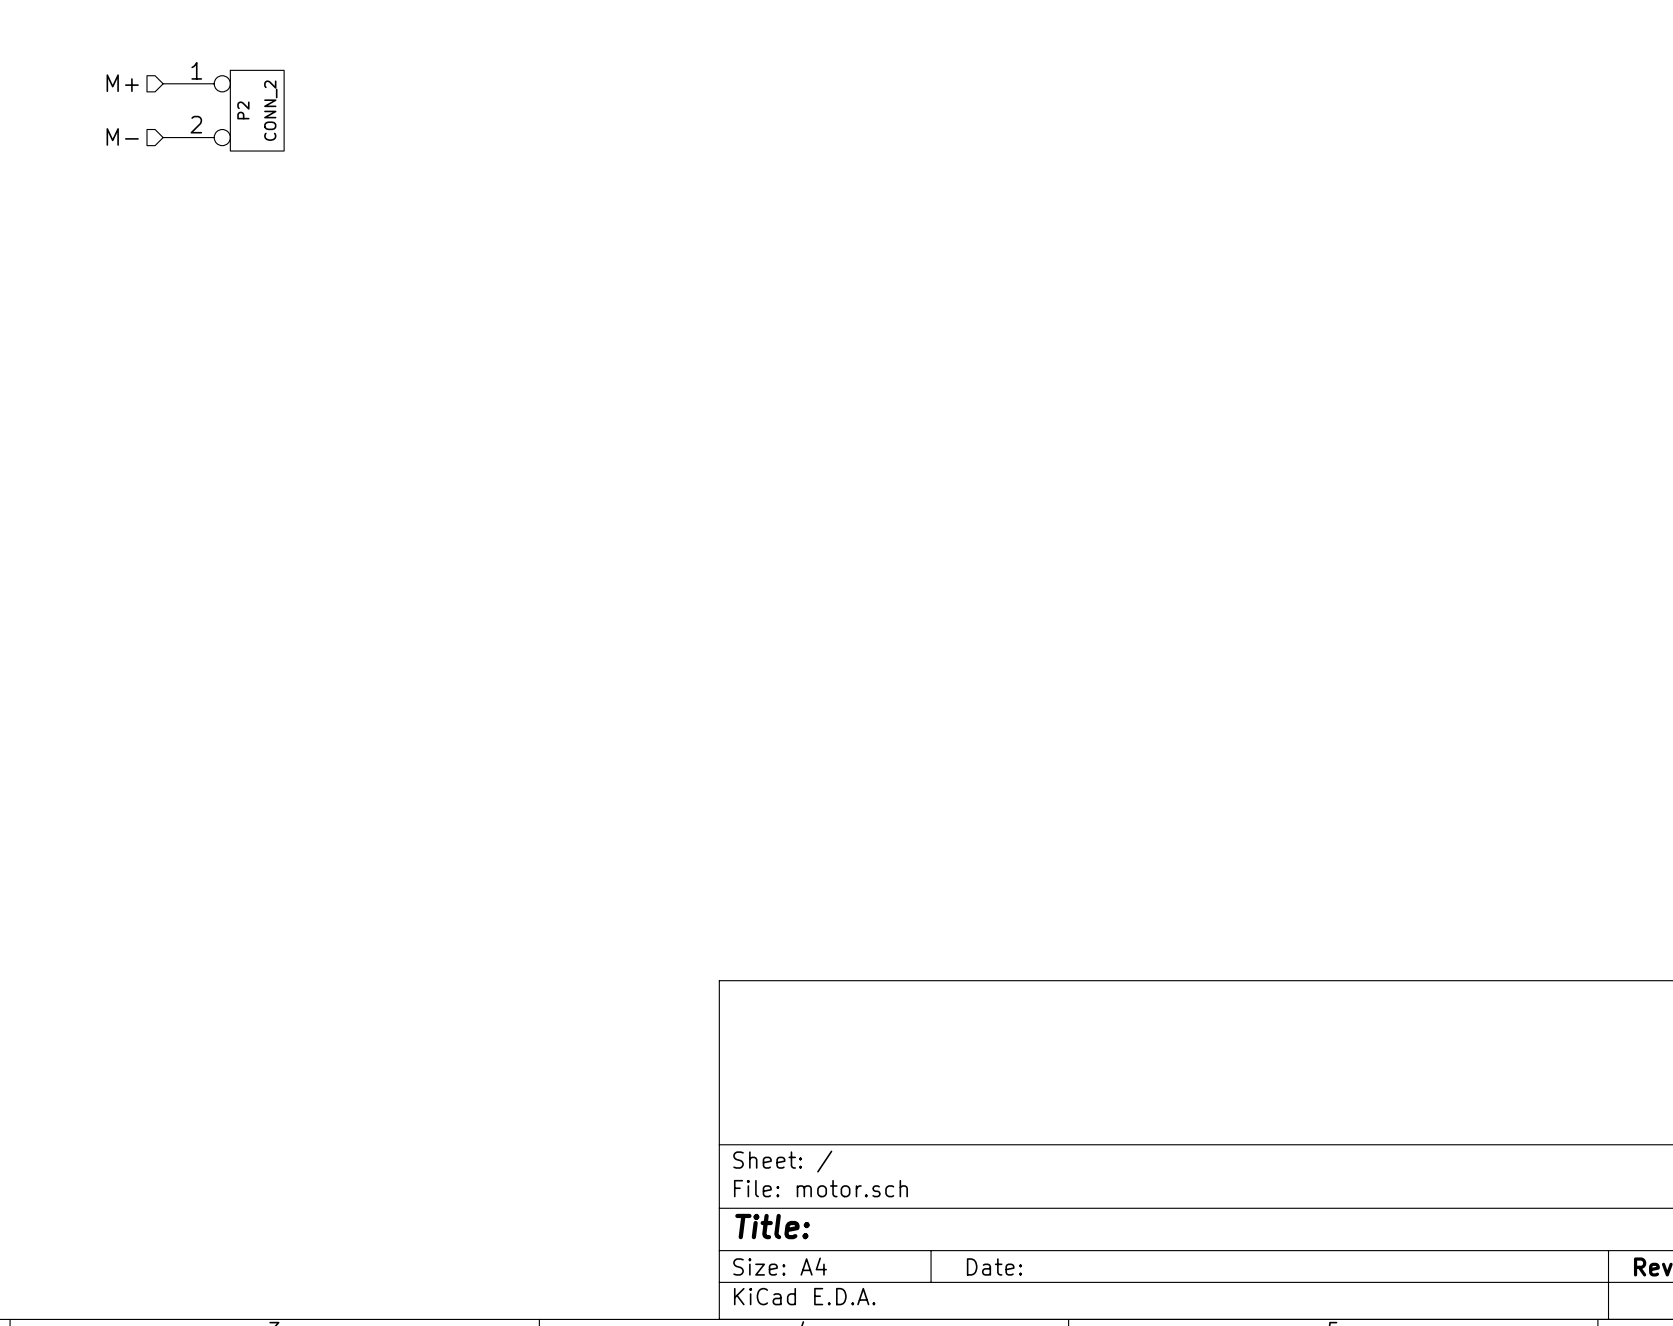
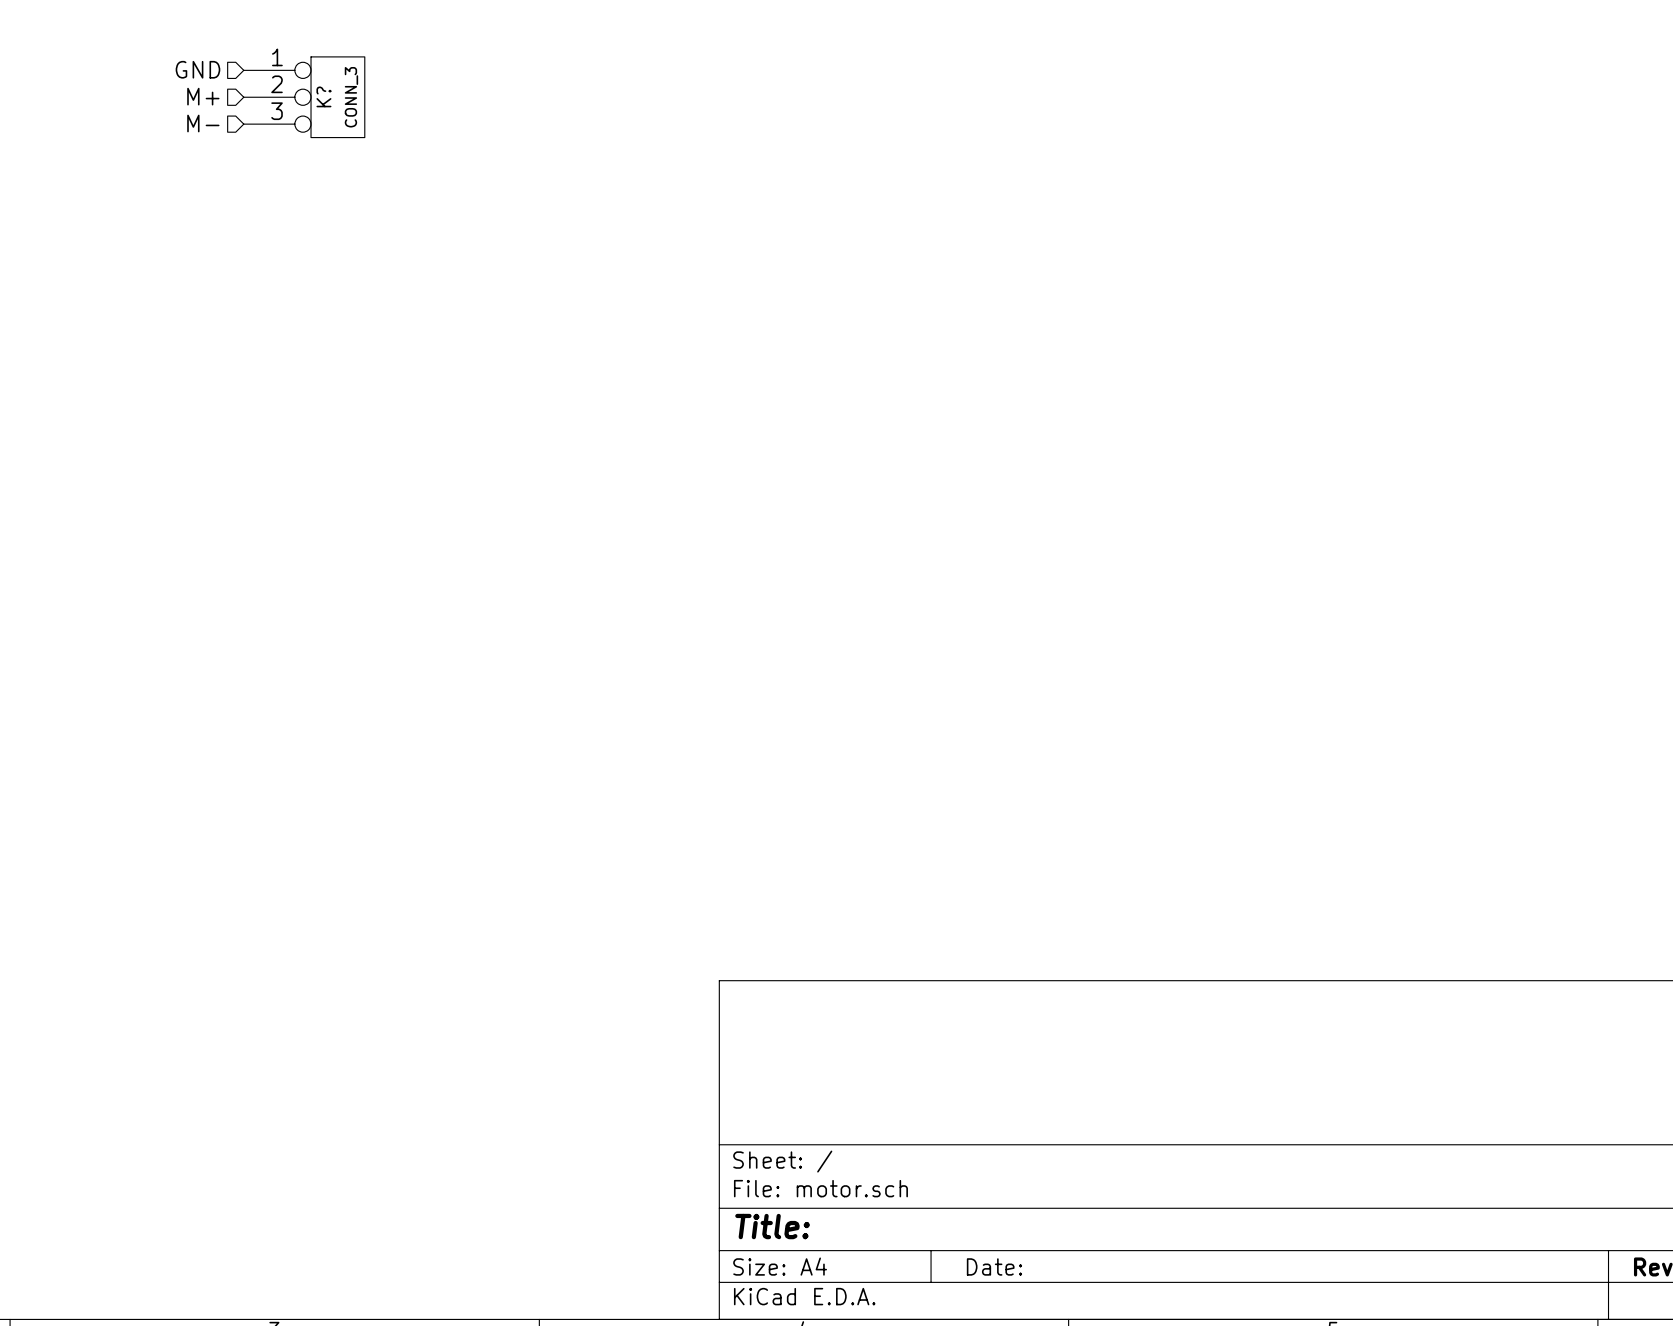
hierarchical label: none -> GND (197, 69)
hierarchical label position: M+ (122, 83) -> M+ (203, 96)
K?: none -> CONN_3 (304, 97)
P2: CONN_2 (223, 110) -> none
hierarchical label position: M- (122, 136) -> M- (203, 123)

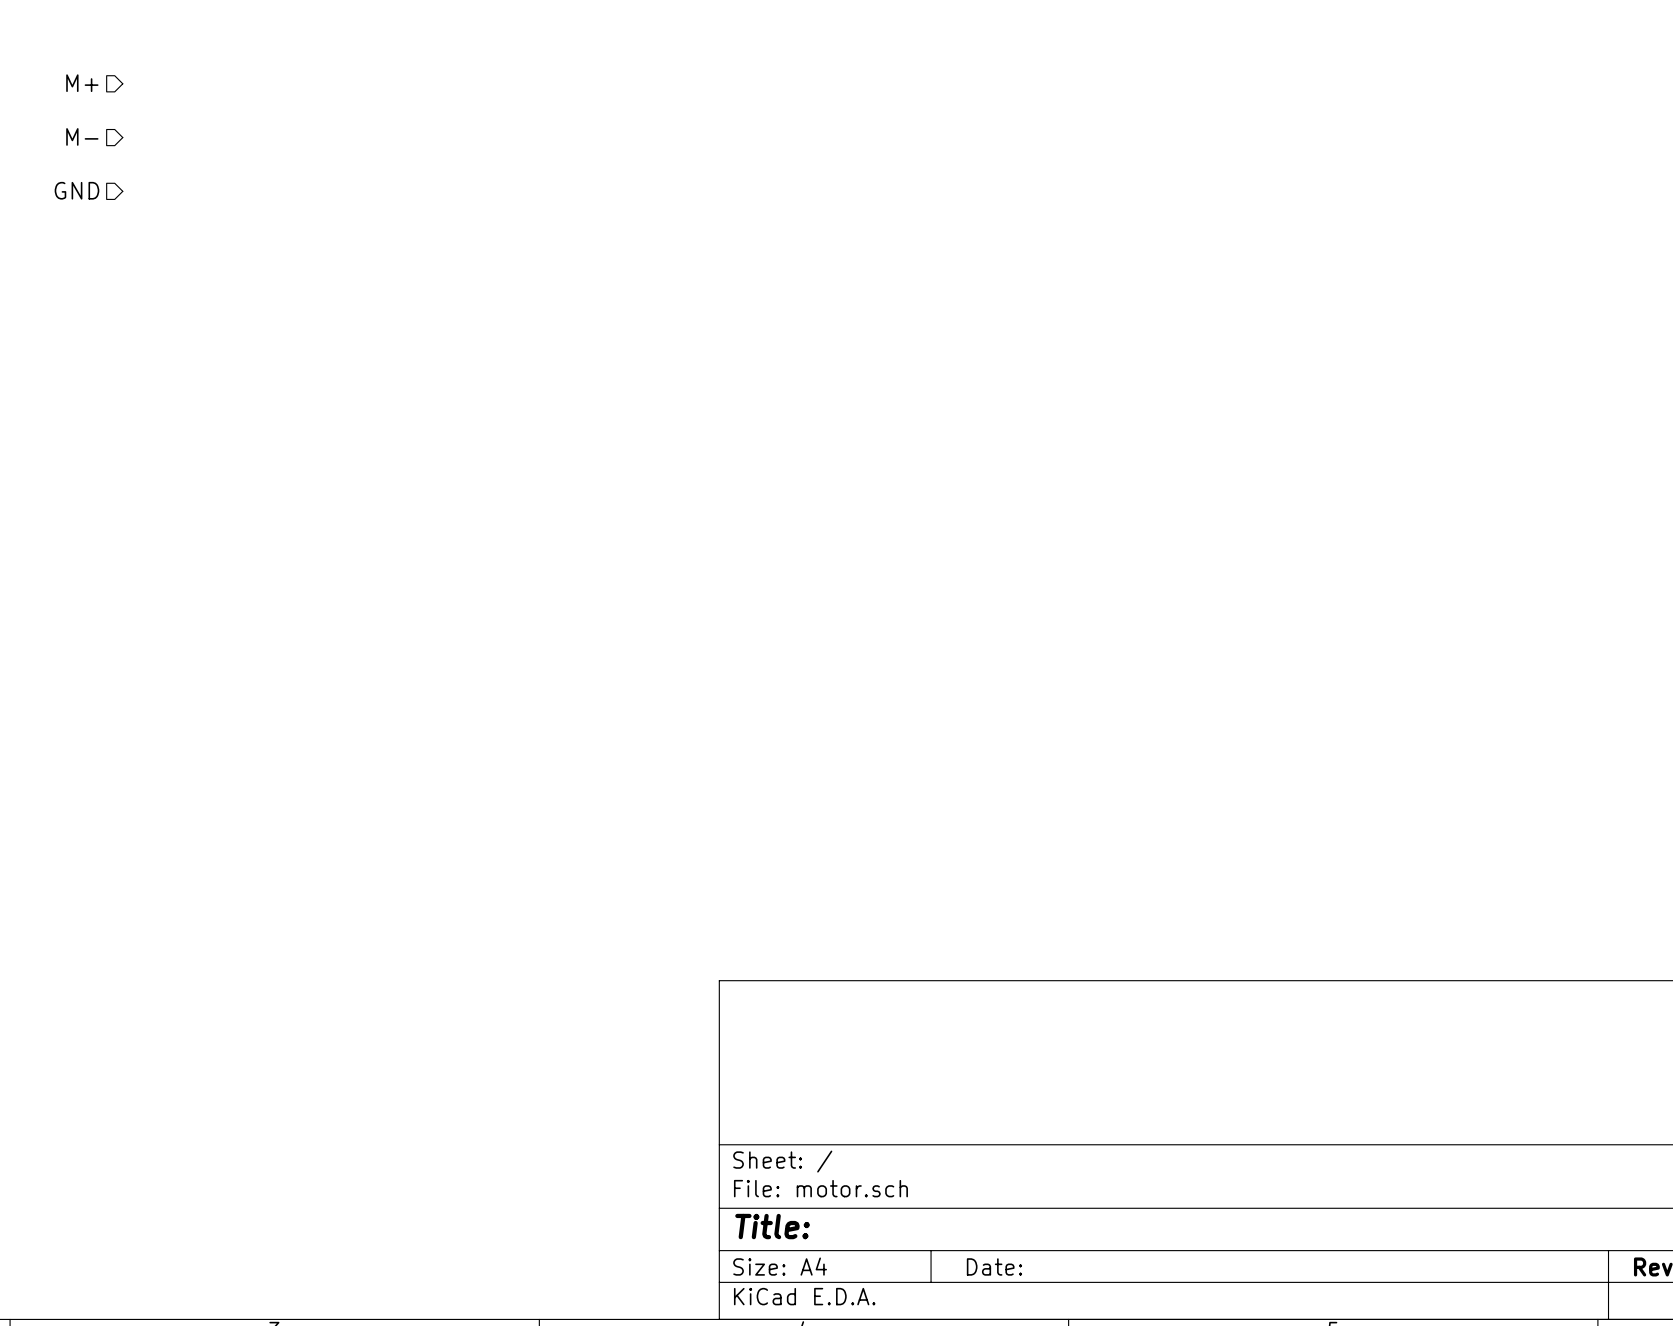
hierarchical label position: GND (197, 69) -> GND (76, 190)
hierarchical label position: M+ (203, 96) -> M+ (82, 83)
K?: CONN_3 (304, 97) -> none
hierarchical label position: M- (203, 123) -> M- (82, 136)

